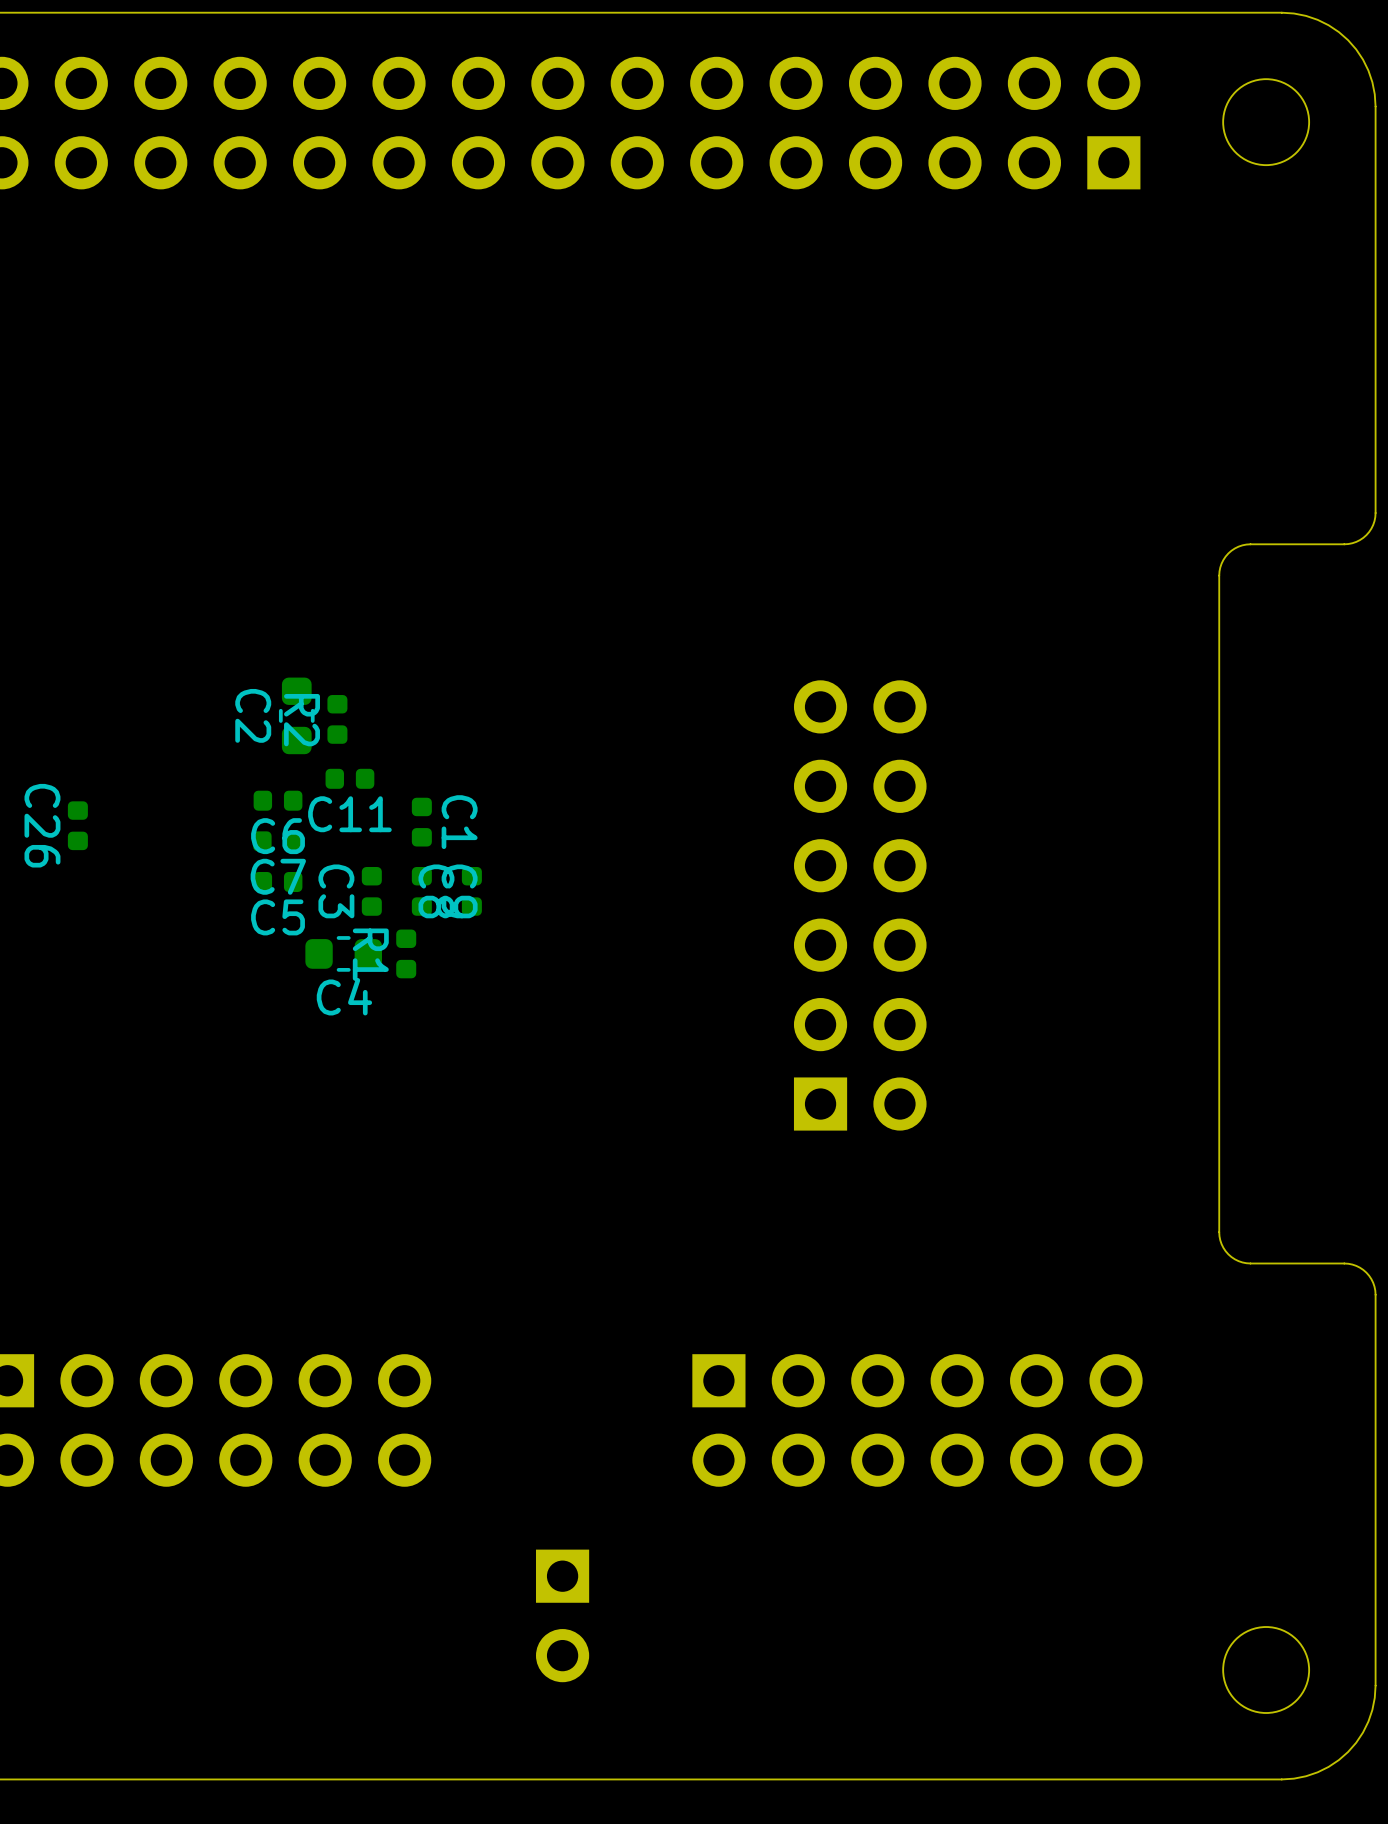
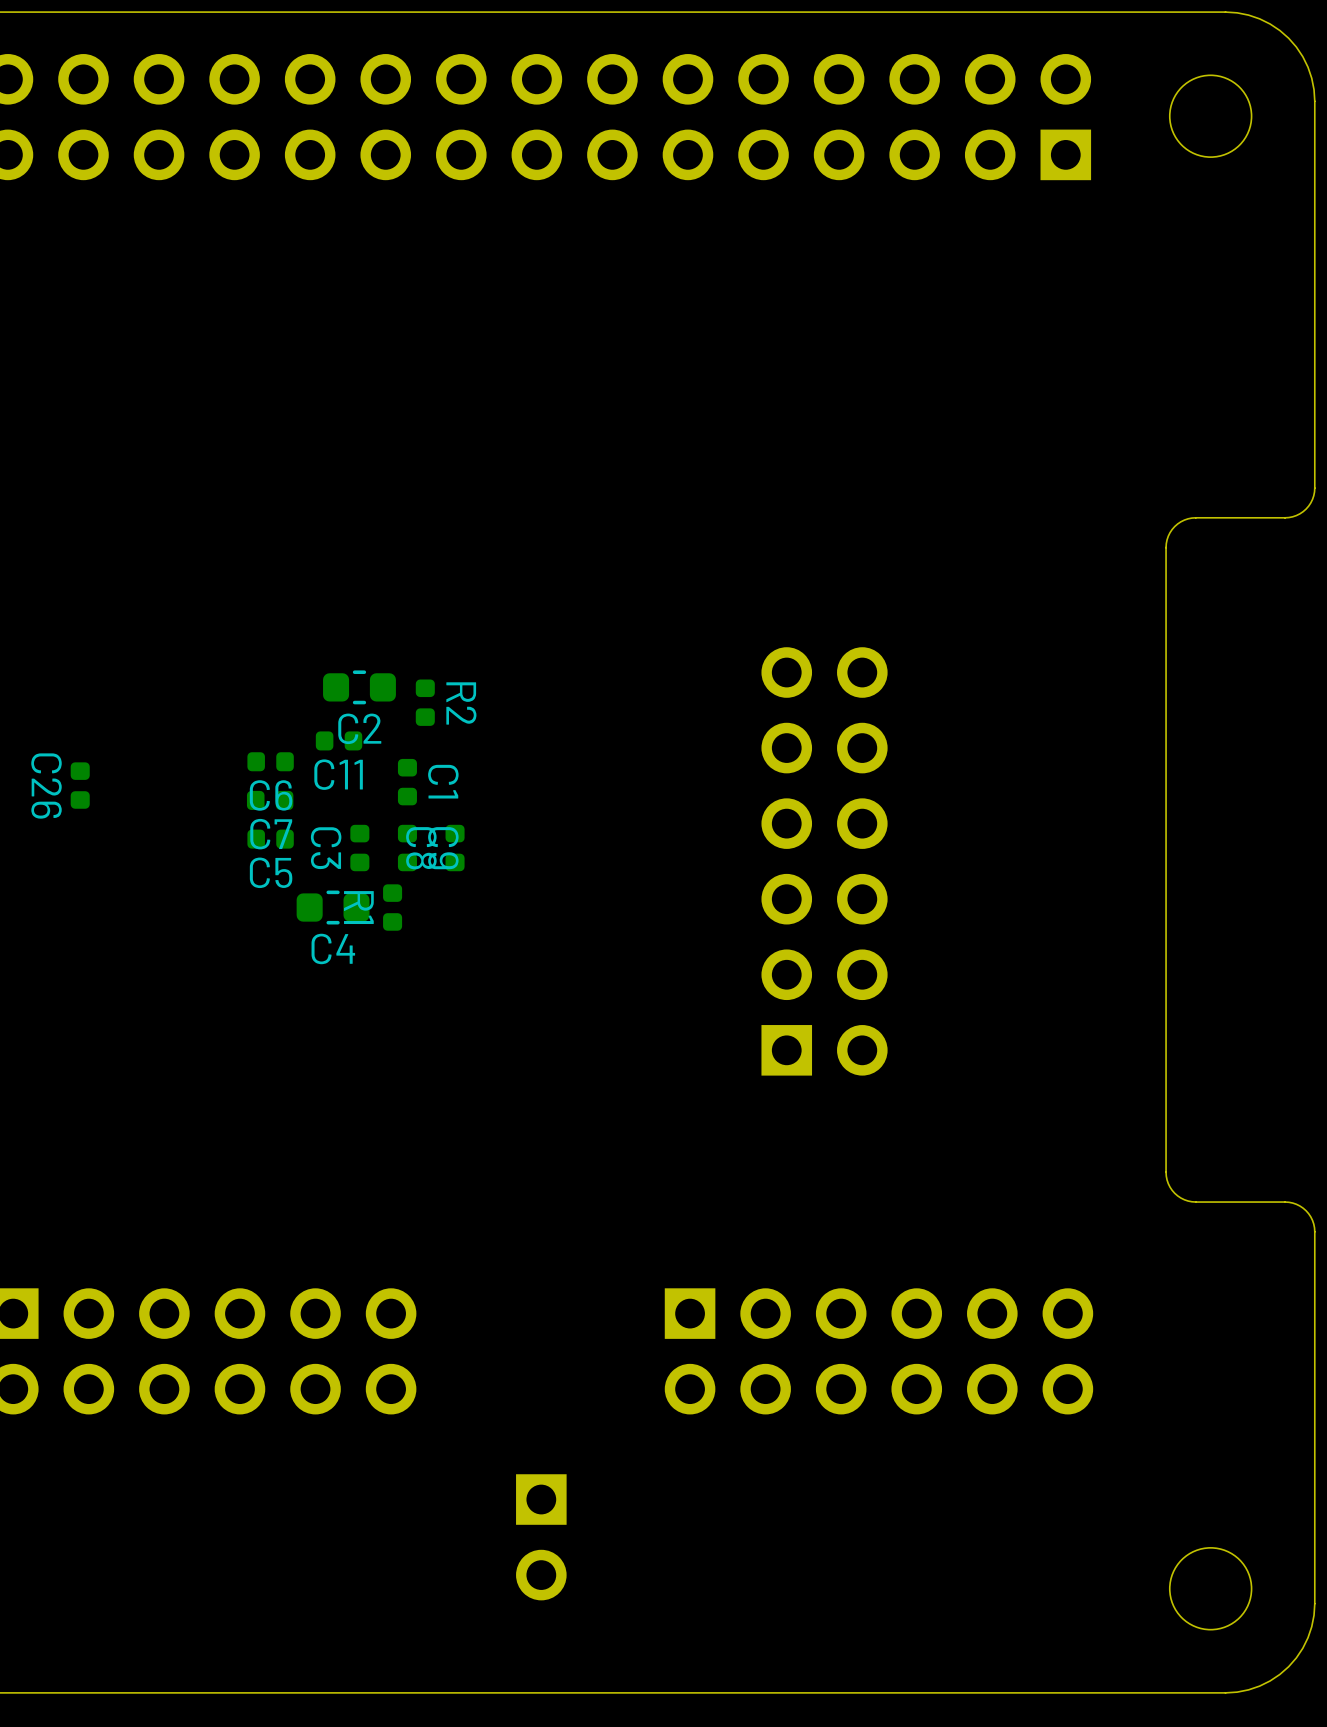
C2 name position: C2 (253, 715) -> C2 (359, 728)
C2 rotation: 0° (296, 715) -> 90° clockwise (359, 687)
C2 position: (296, 715) -> (359, 687)
R2 position: (337, 719) -> (425, 702)
R2 name position: R2 (302, 720) -> R2 (461, 703)

